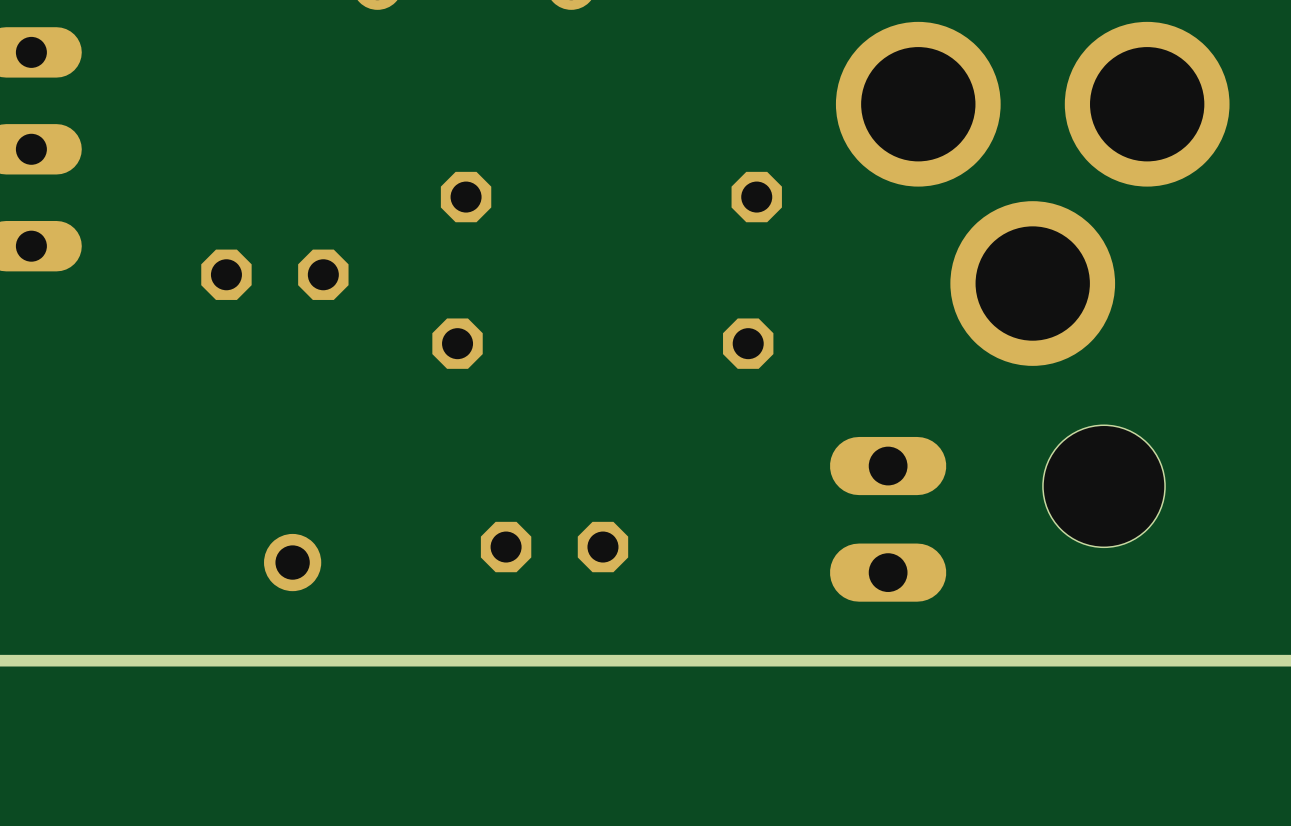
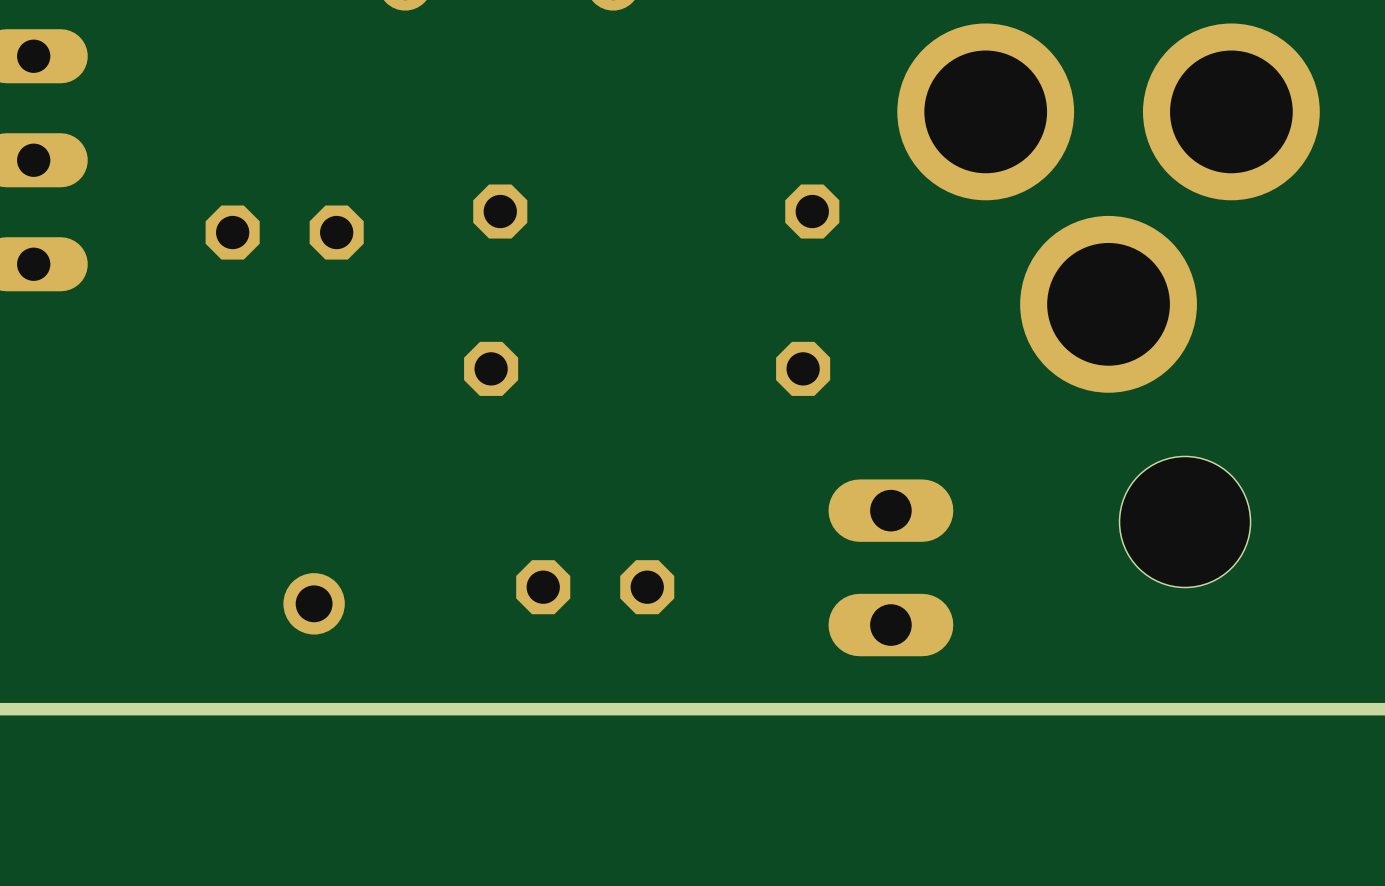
part position: (274, 274) -> (284, 232)
part position: (888, 519) -> (890, 567)

